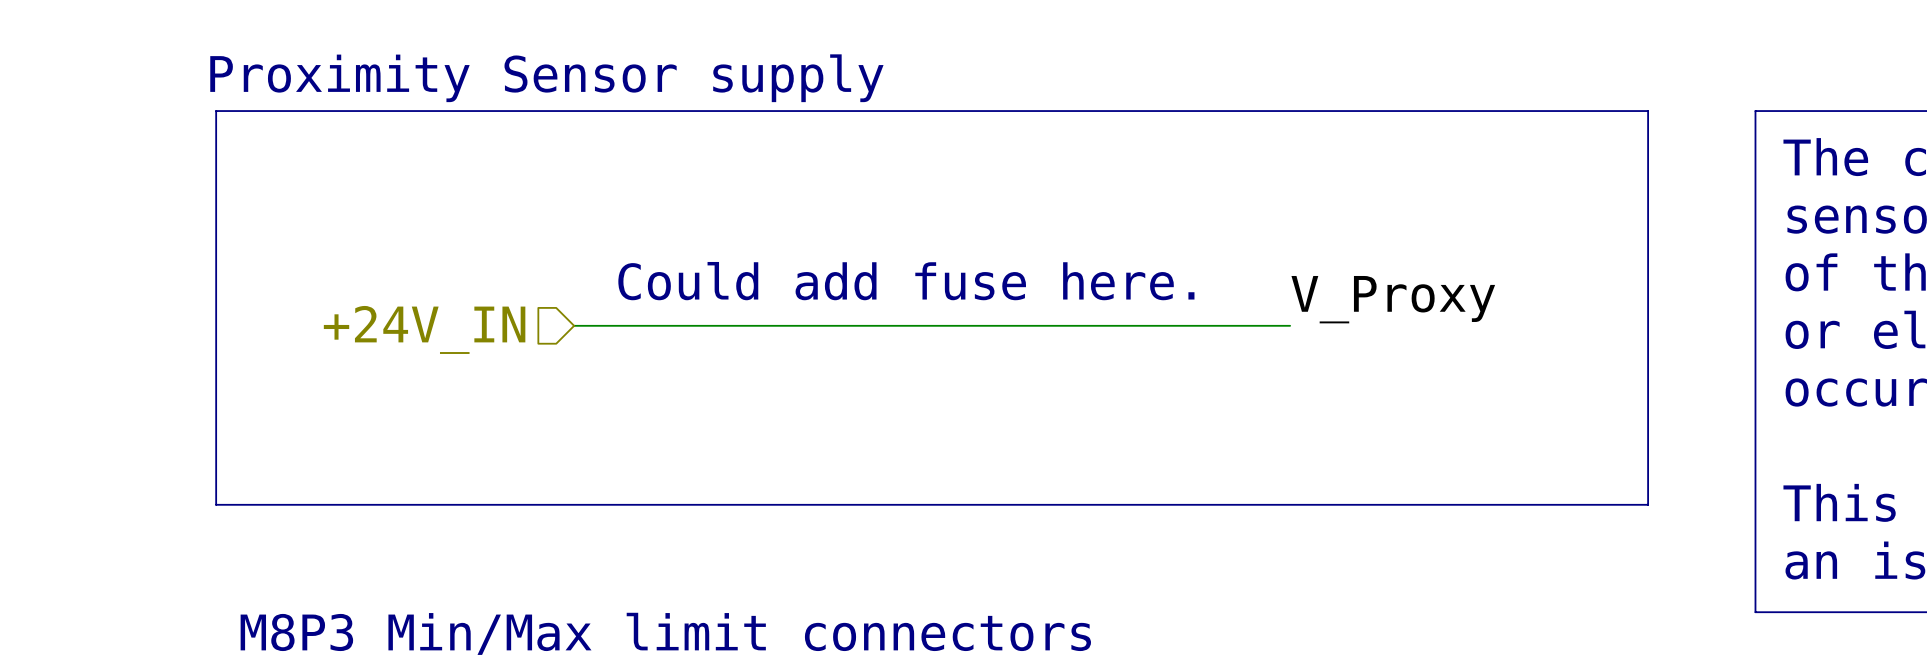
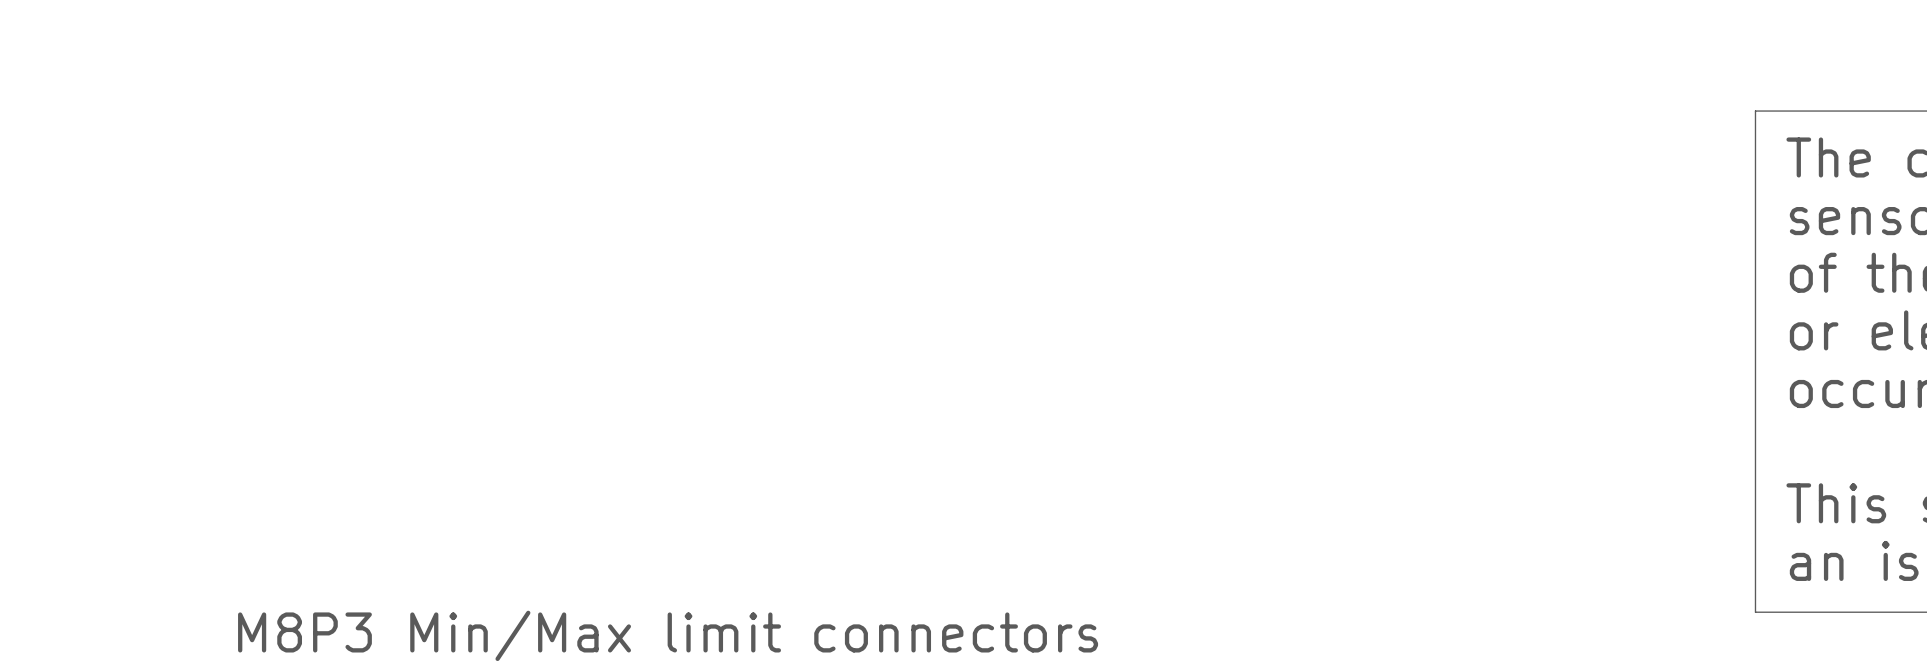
text: Proximity Sensor supply (546, 78) -> none
line: (216, 111) (216, 504) (1648, 504) (1648, 111) (216, 111) -> none
text: Could add fuse here. (906, 281) -> none
label: V_Proxy (1393, 299) -> none
wire: (574, 325) (1290, 325) -> none
hierarchical label: +24V_IN (424, 329) -> none

